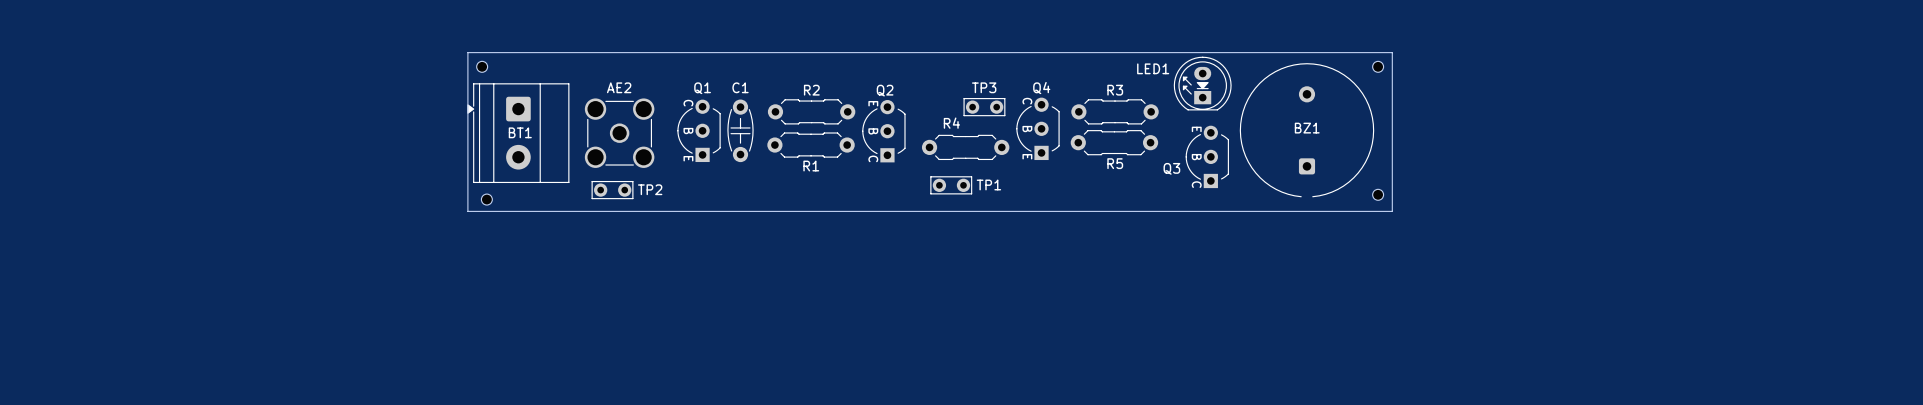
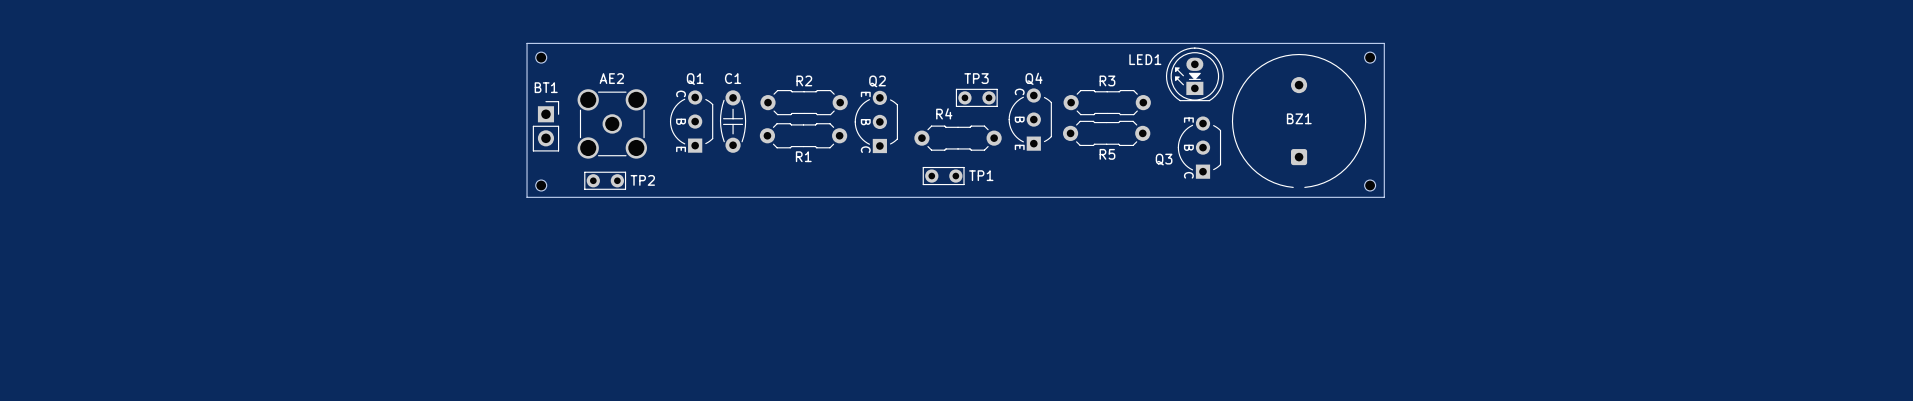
board edge: (534, 52) (467, 52) (467, 211) (1392, 211) (1392, 206) -> (527, 43) (527, 197) (1384, 197)
part position: (482, 66) -> (541, 57)
BT1 footprint: [467, 83, 570, 184] -> [532, 101, 560, 152]
BT1 name position: BT1 (520, 132) -> BT1 (546, 87)
part position: (486, 199) -> (541, 185)

